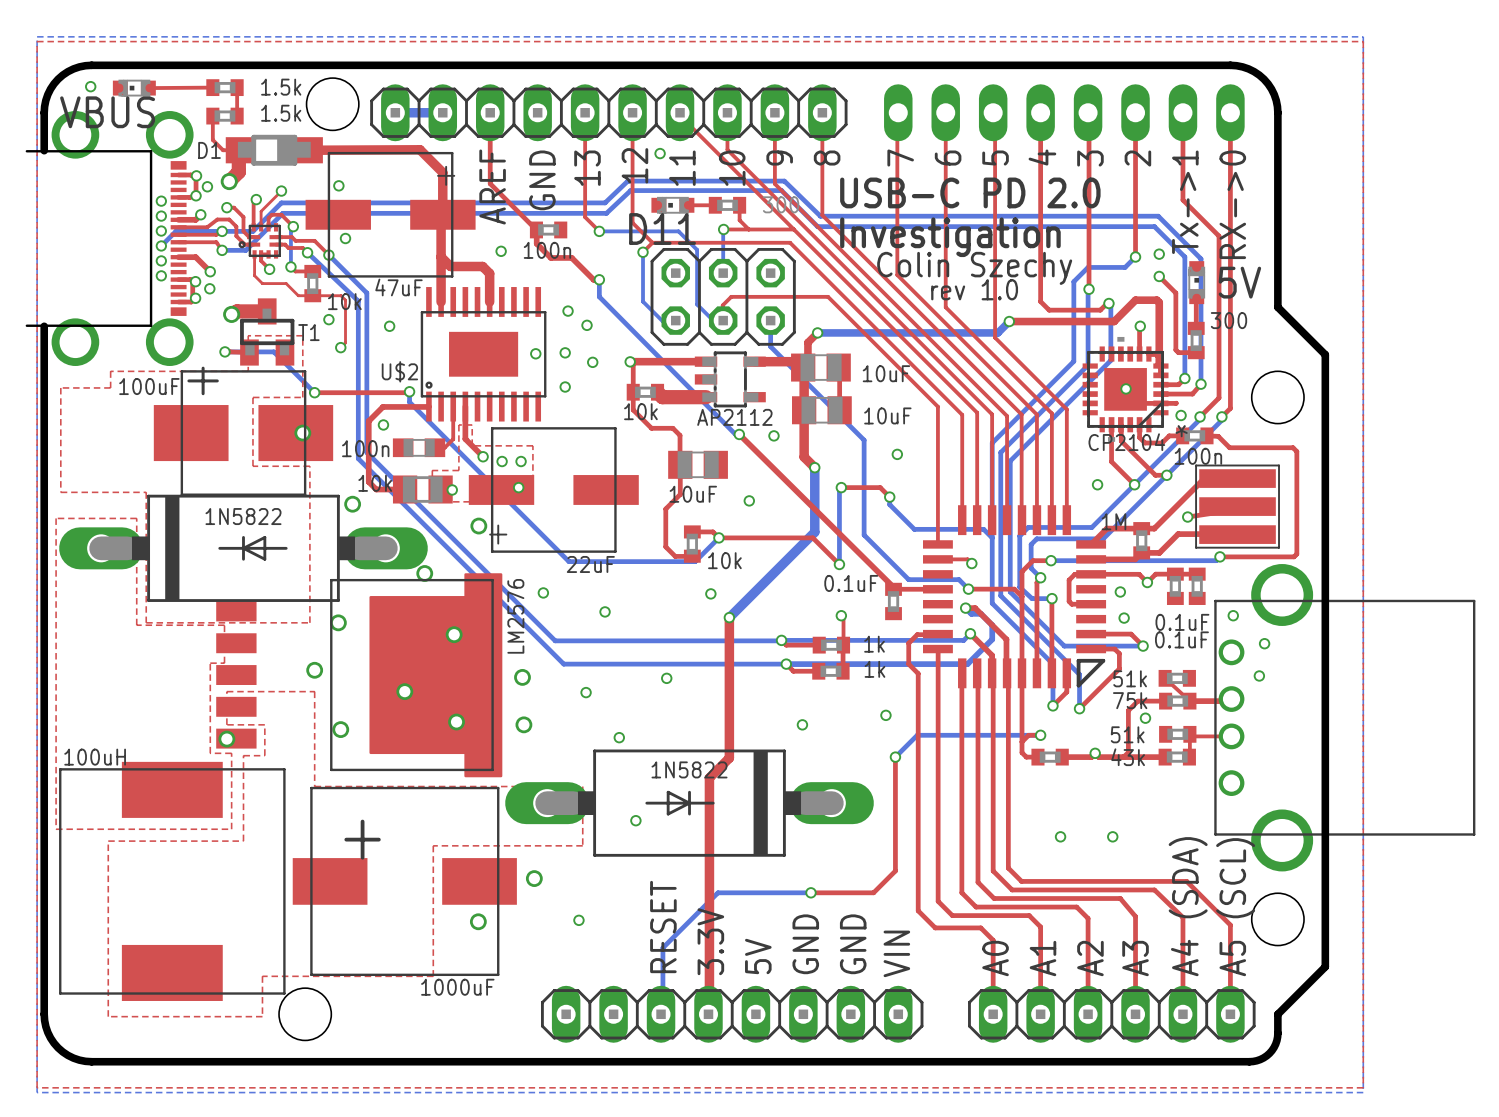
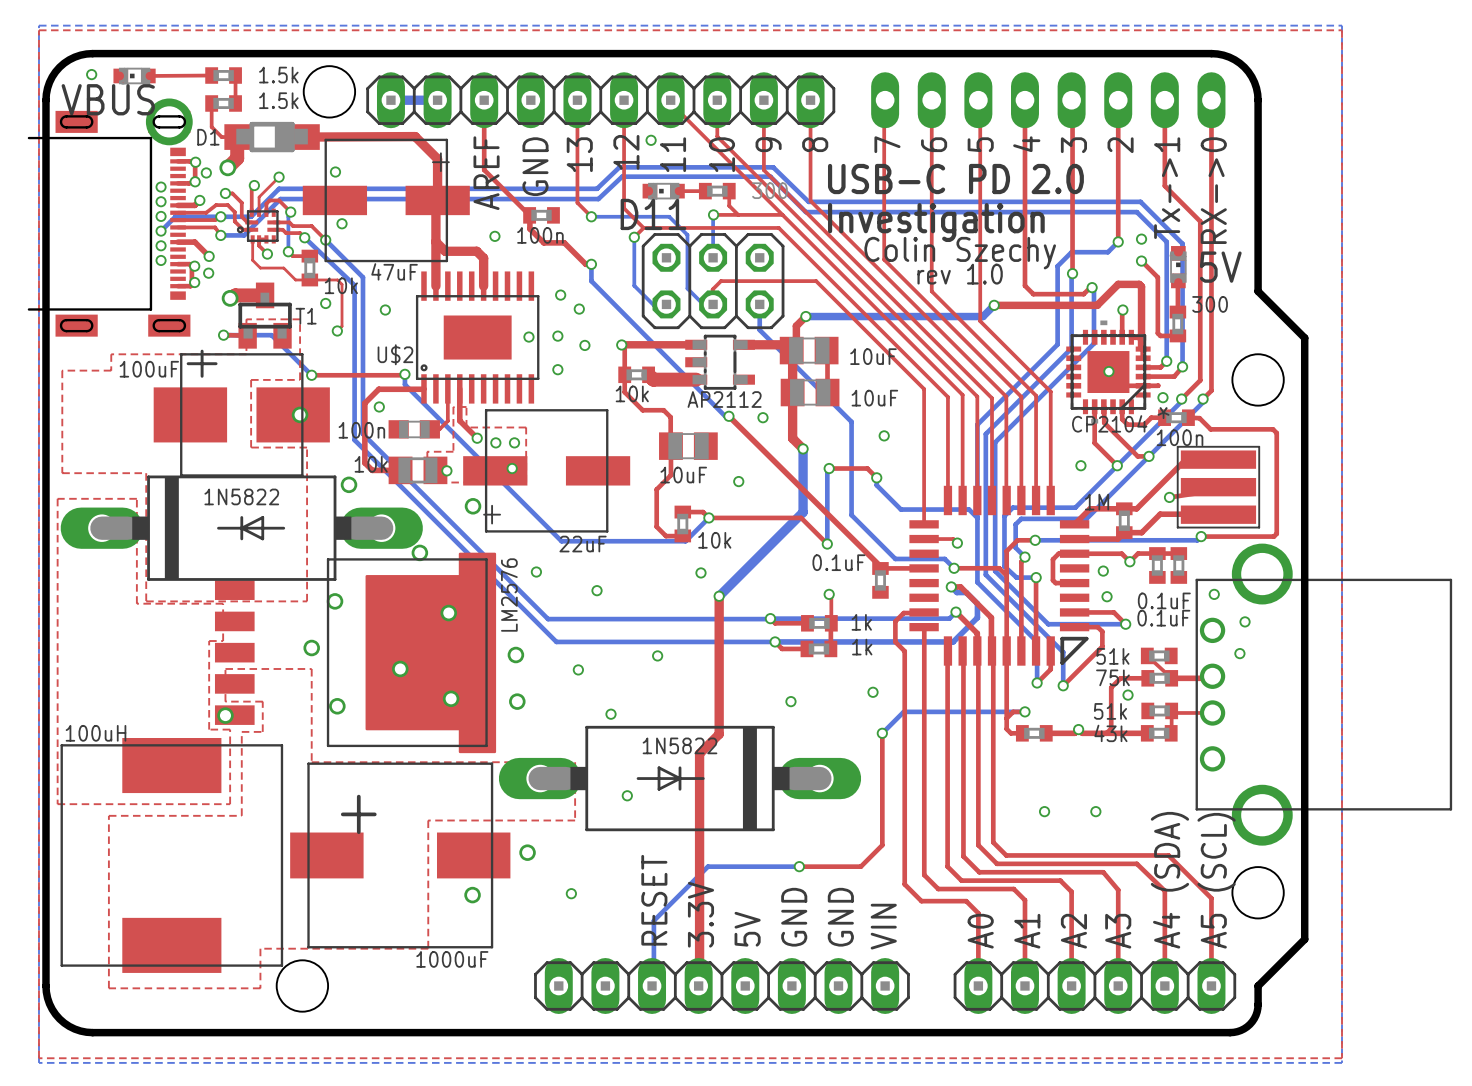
part footprint: [25, 111, 194, 366] -> [27, 98, 193, 337]
board edge: none -> (45, 137) (45, 310)

